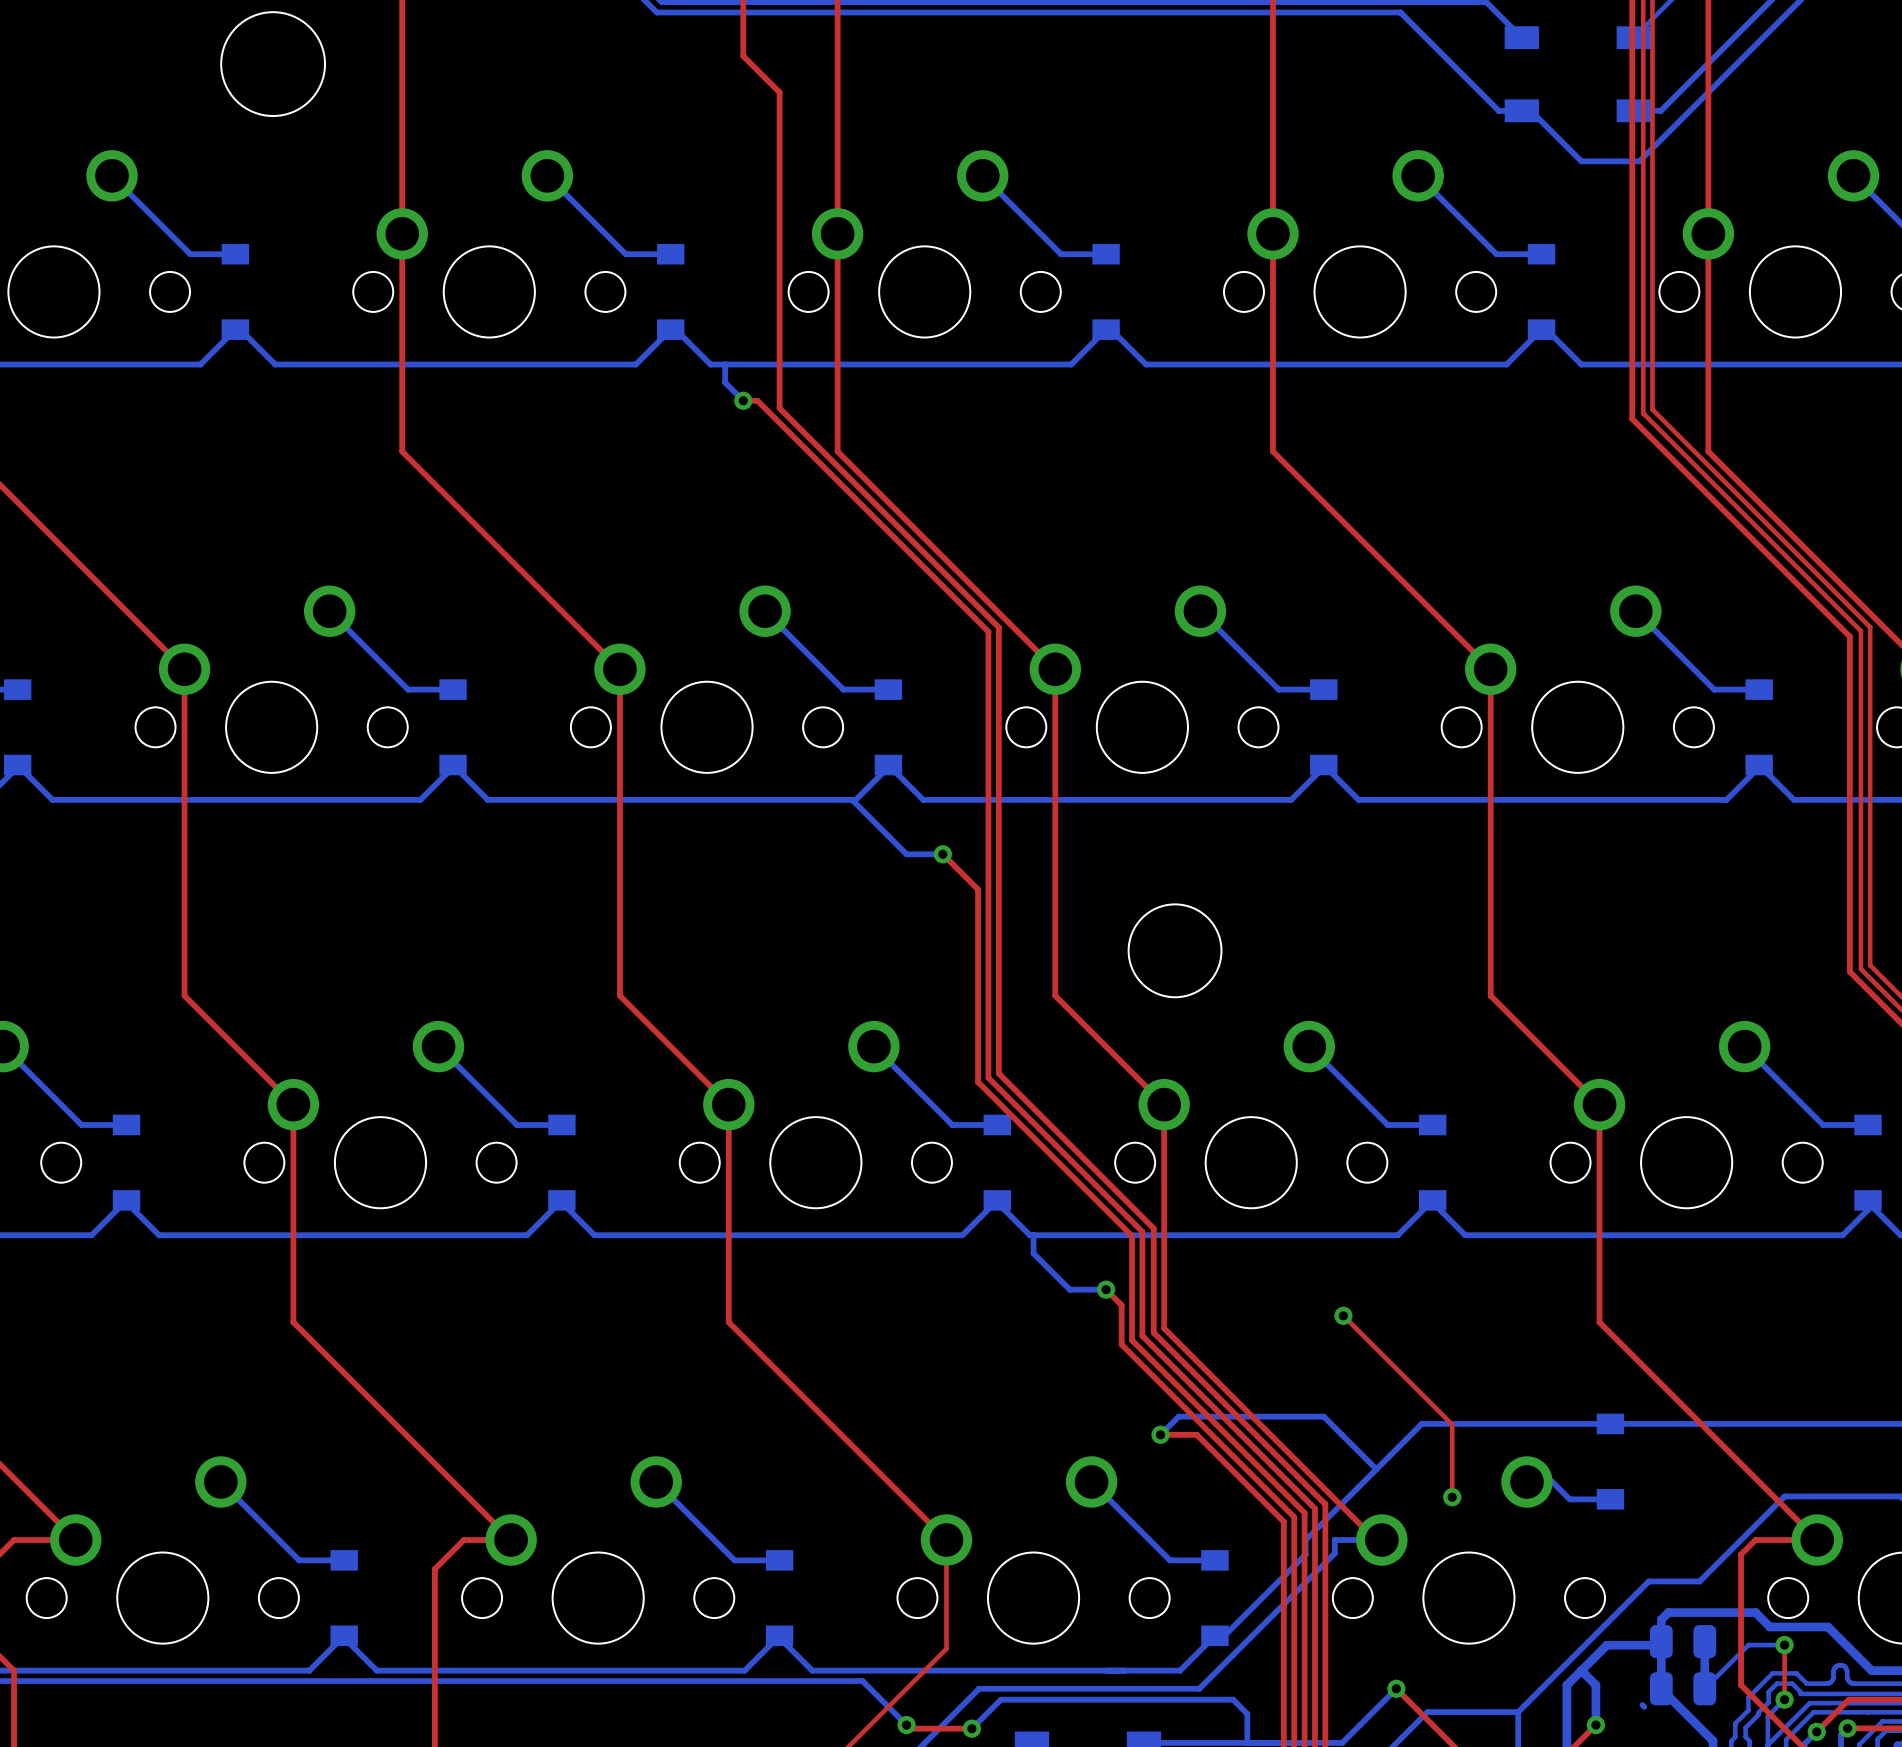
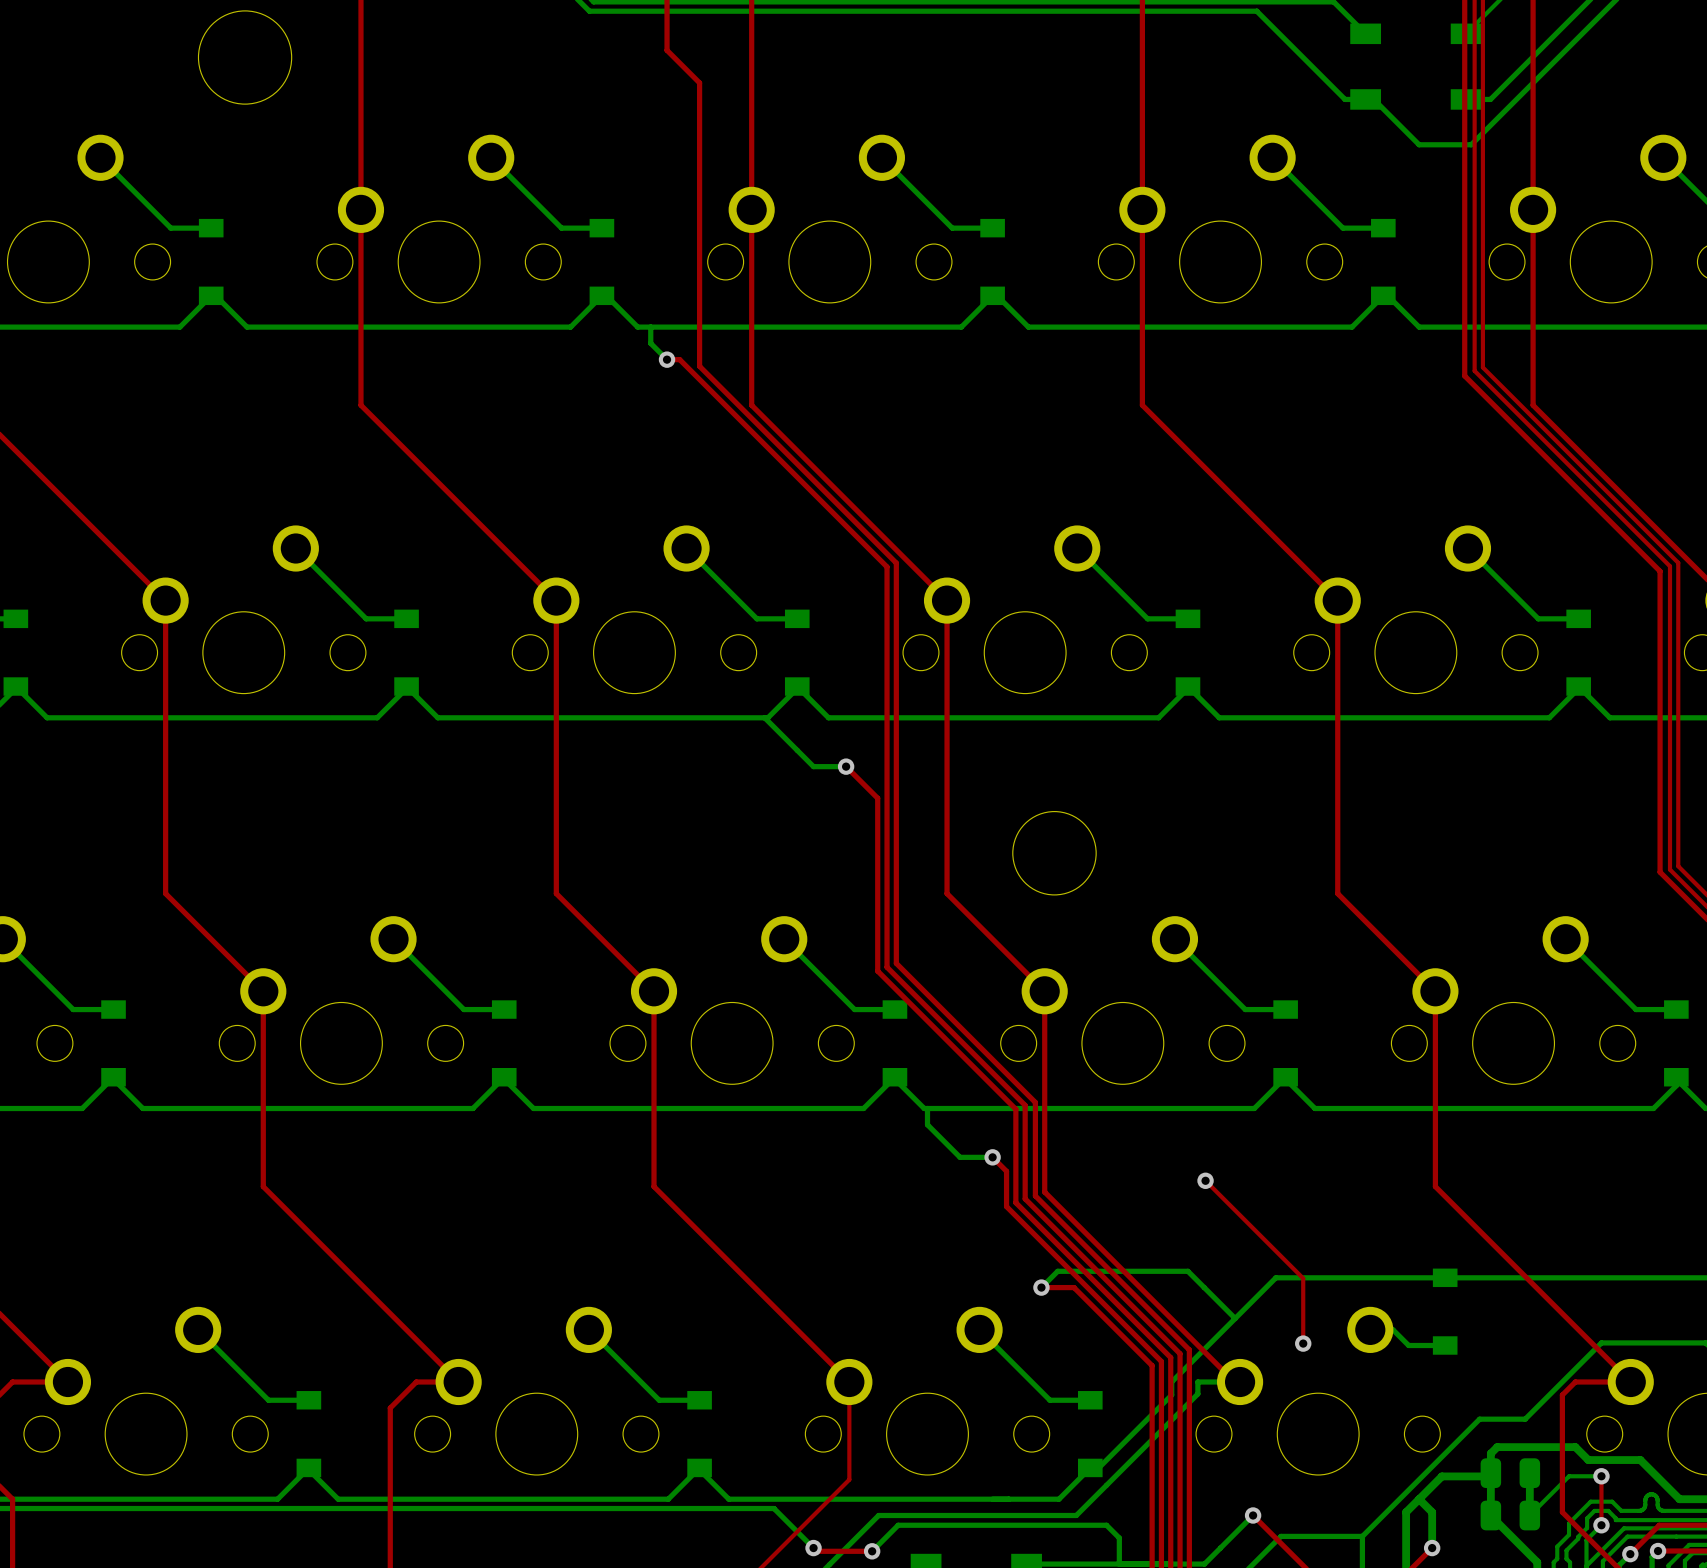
bottom track: (1642, 1705) (1644, 1706) -> none

